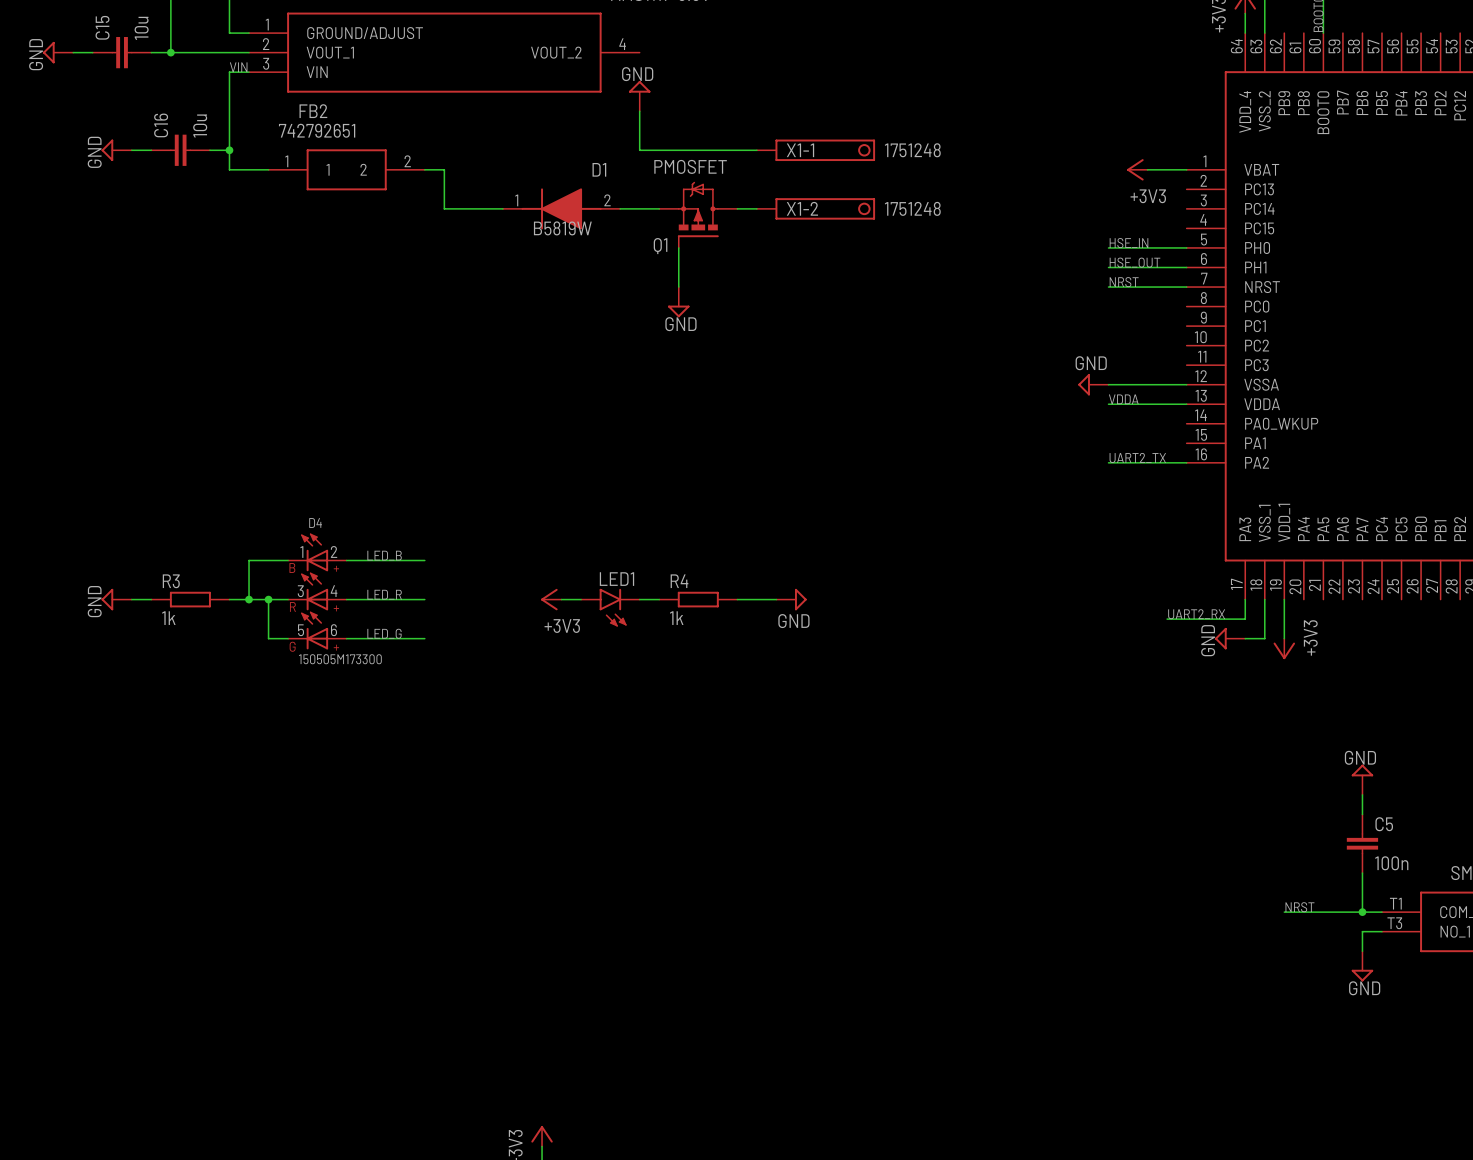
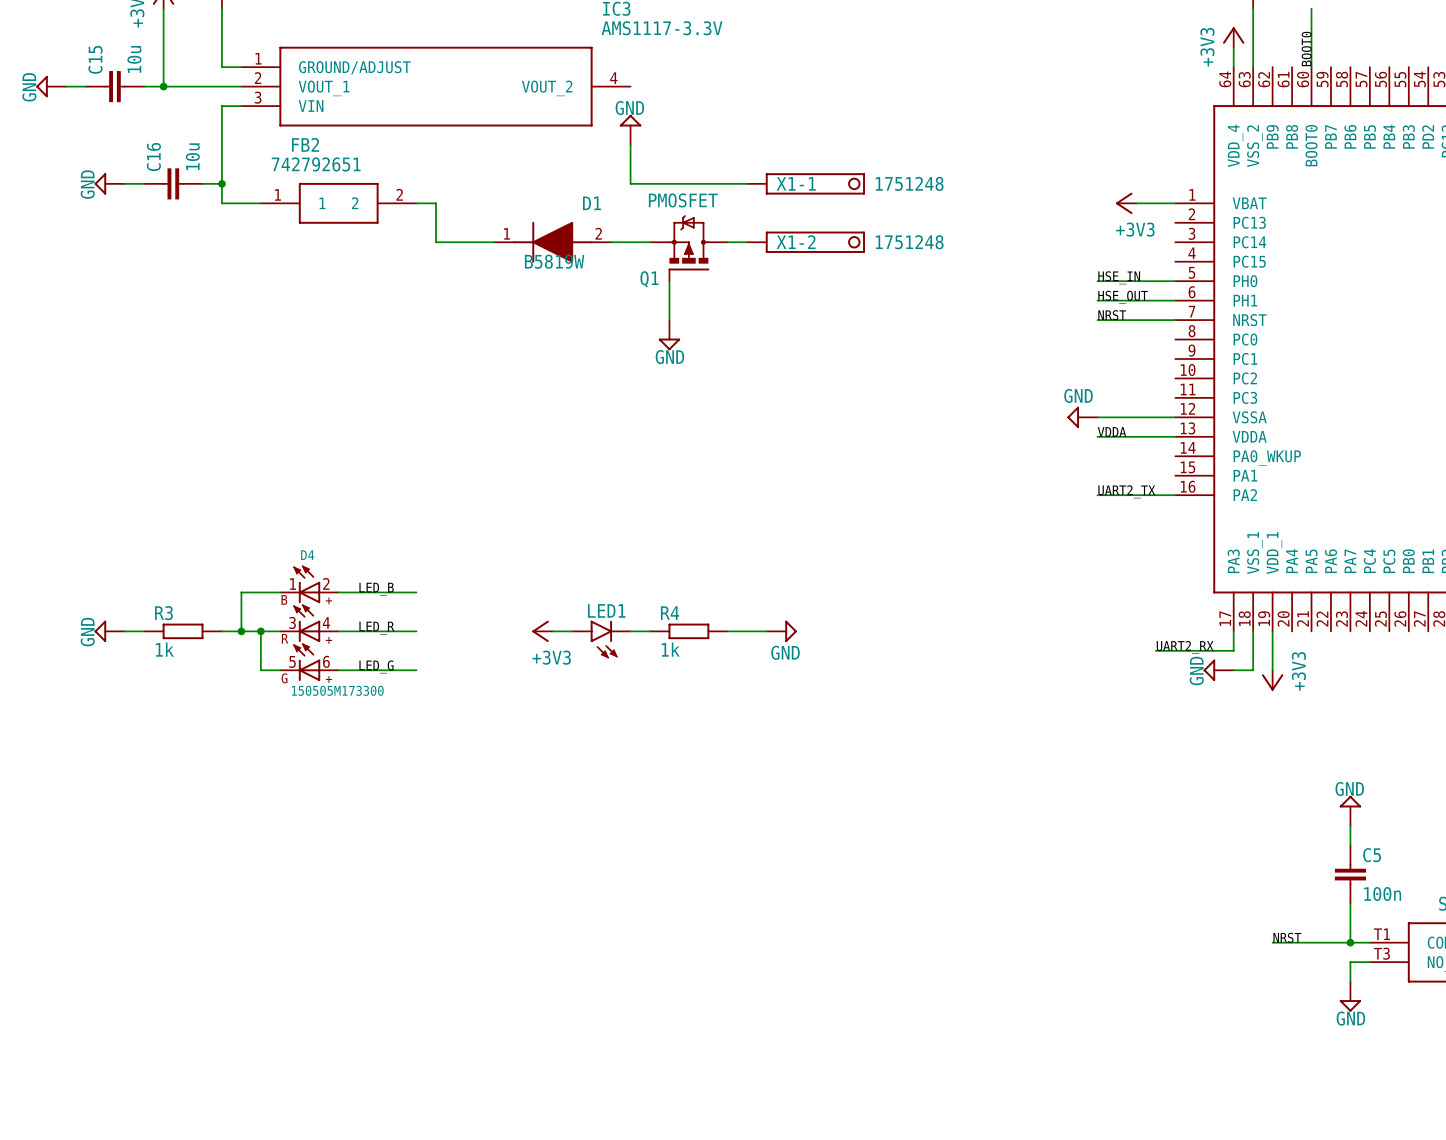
label: VIN (238, 67) -> none

